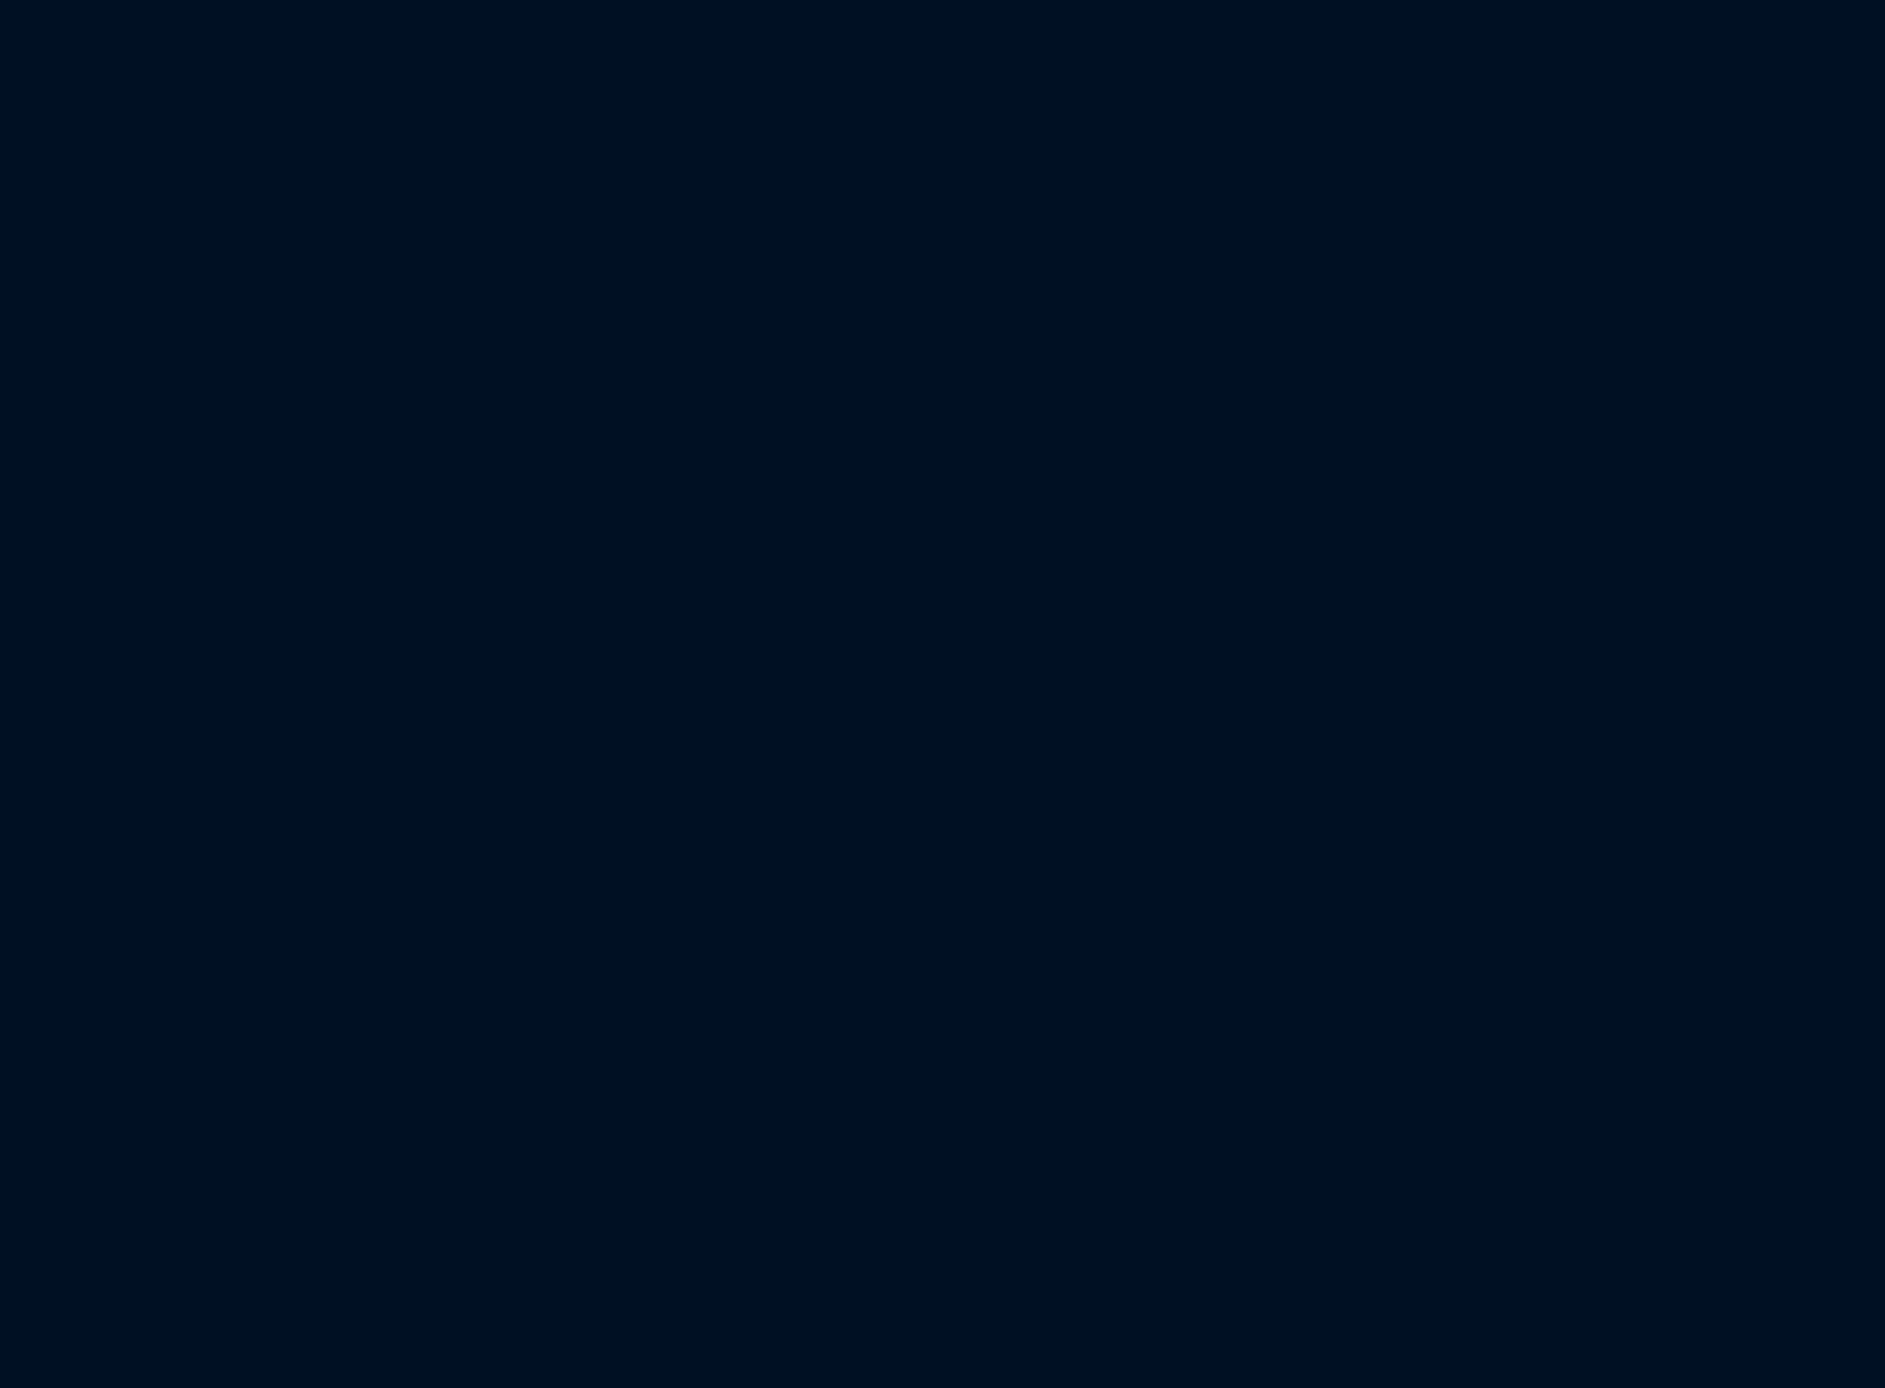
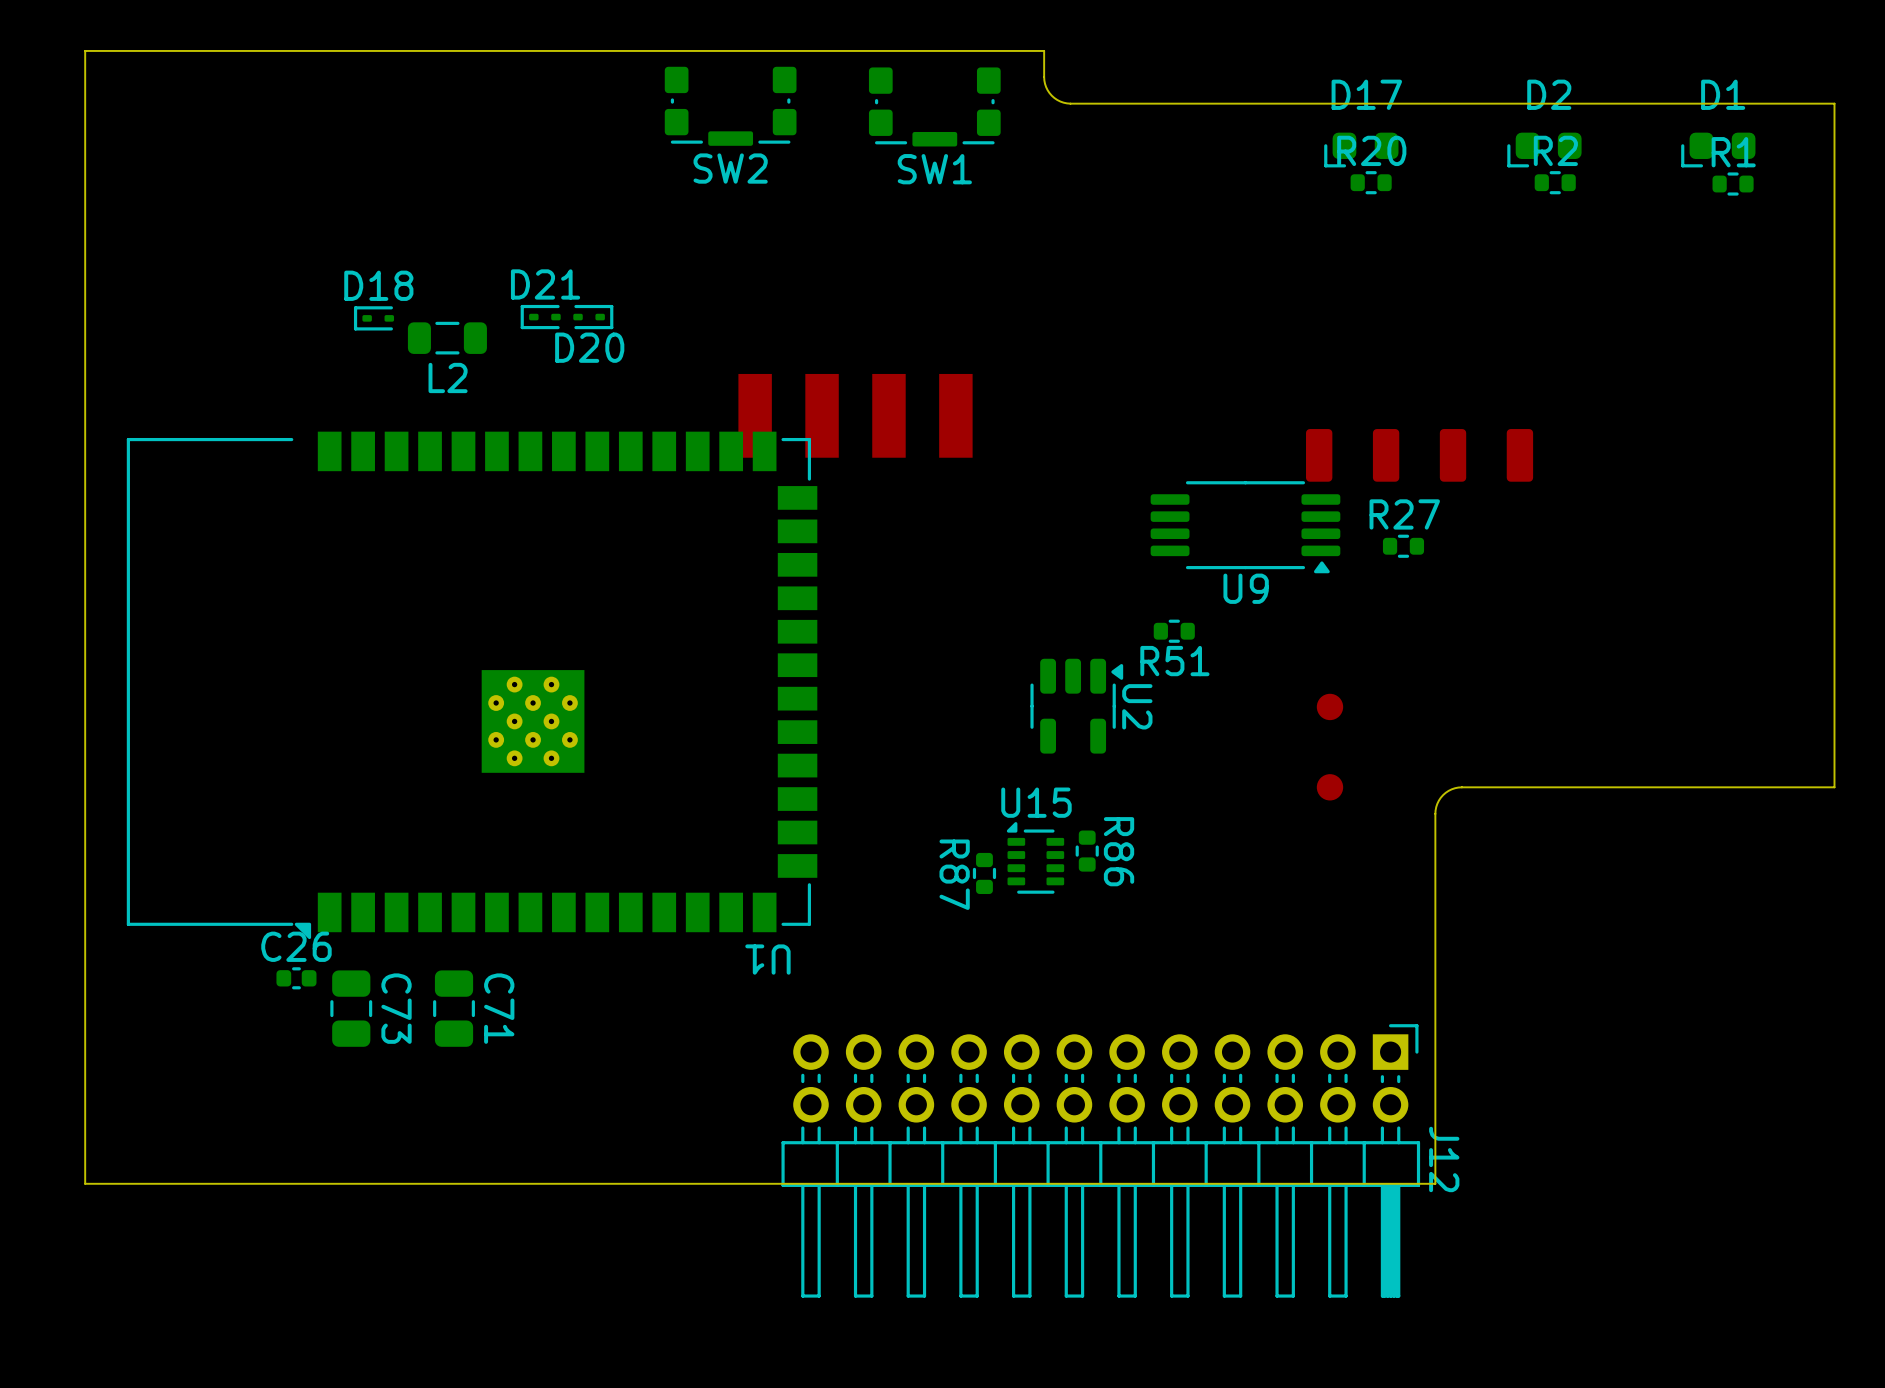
board edge: none -> (1044, 50) (85, 50) (85, 1183) (1435, 1183) (1435, 813) (1437, 803) (1443, 795) (1451, 789) (1461, 787) (1834, 787) (1834, 103) (1070, 103) (1057, 99) (1047, 90) (1044, 80) (1044, 50)
SW2: none -> (730, 106)
SW1: none -> (934, 106)
D17: none -> (1361, 150)
D2: none -> (1544, 150)
D1: none -> (1718, 150)
R20: none -> (1371, 182)
R2: none -> (1555, 182)
R1: none -> (1733, 184)
D21: none -> (540, 317)
D20: none -> (593, 317)
D18: none -> (373, 318)
L2: none -> (447, 338)
part: none -> (855, 415)
part: none -> (1419, 455)
U9: none -> (1245, 527)
R27: none -> (1403, 546)
R51: none -> (1174, 631)
U1: none -> (472, 685)
U2: none -> (1076, 706)
part: none -> (1329, 706)
part: none -> (1329, 787)
R86: none -> (1087, 851)
U15: none -> (1035, 857)
R87: none -> (984, 873)
C26: none -> (296, 978)
C73: none -> (351, 1008)
C71: none -> (454, 1008)
J12: none -> (1100, 1160)

